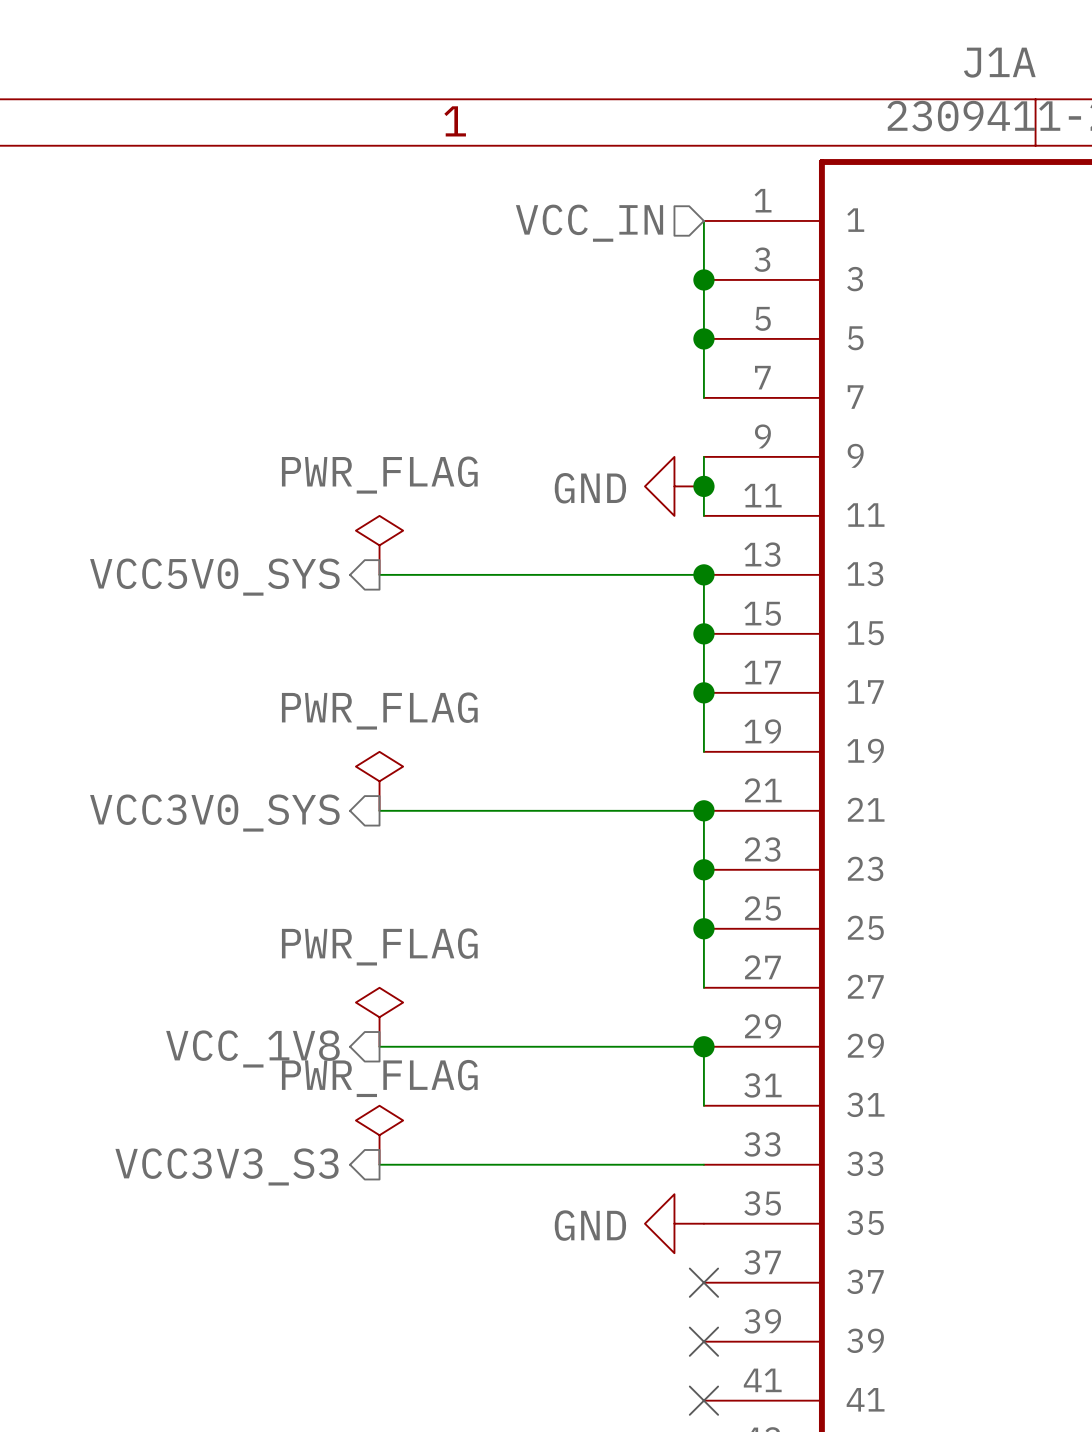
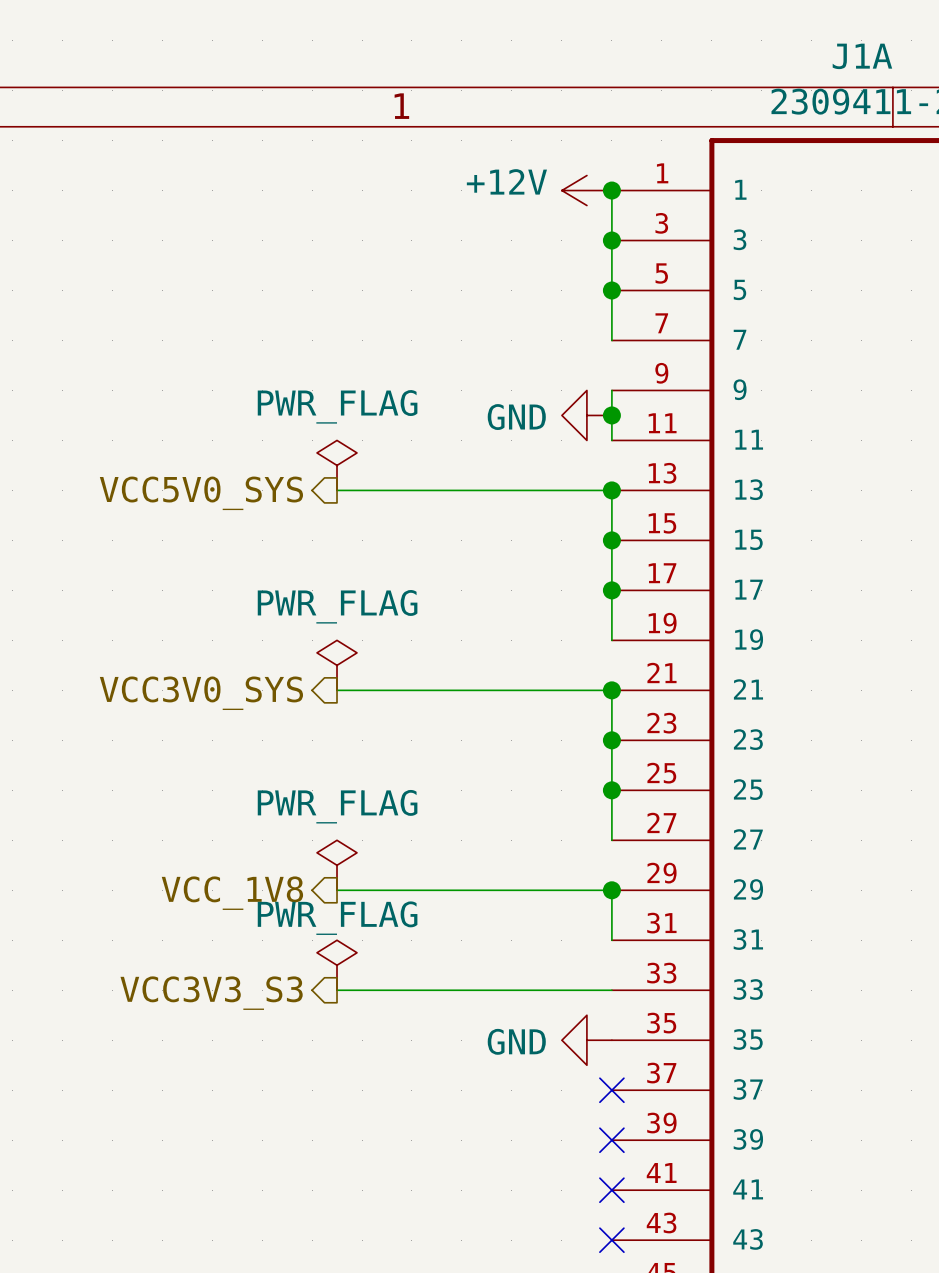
power symbol: none -> +12V (586, 190)
junction: none -> (611, 190)
hierarchical label: VCC_IN (589, 223) -> none

